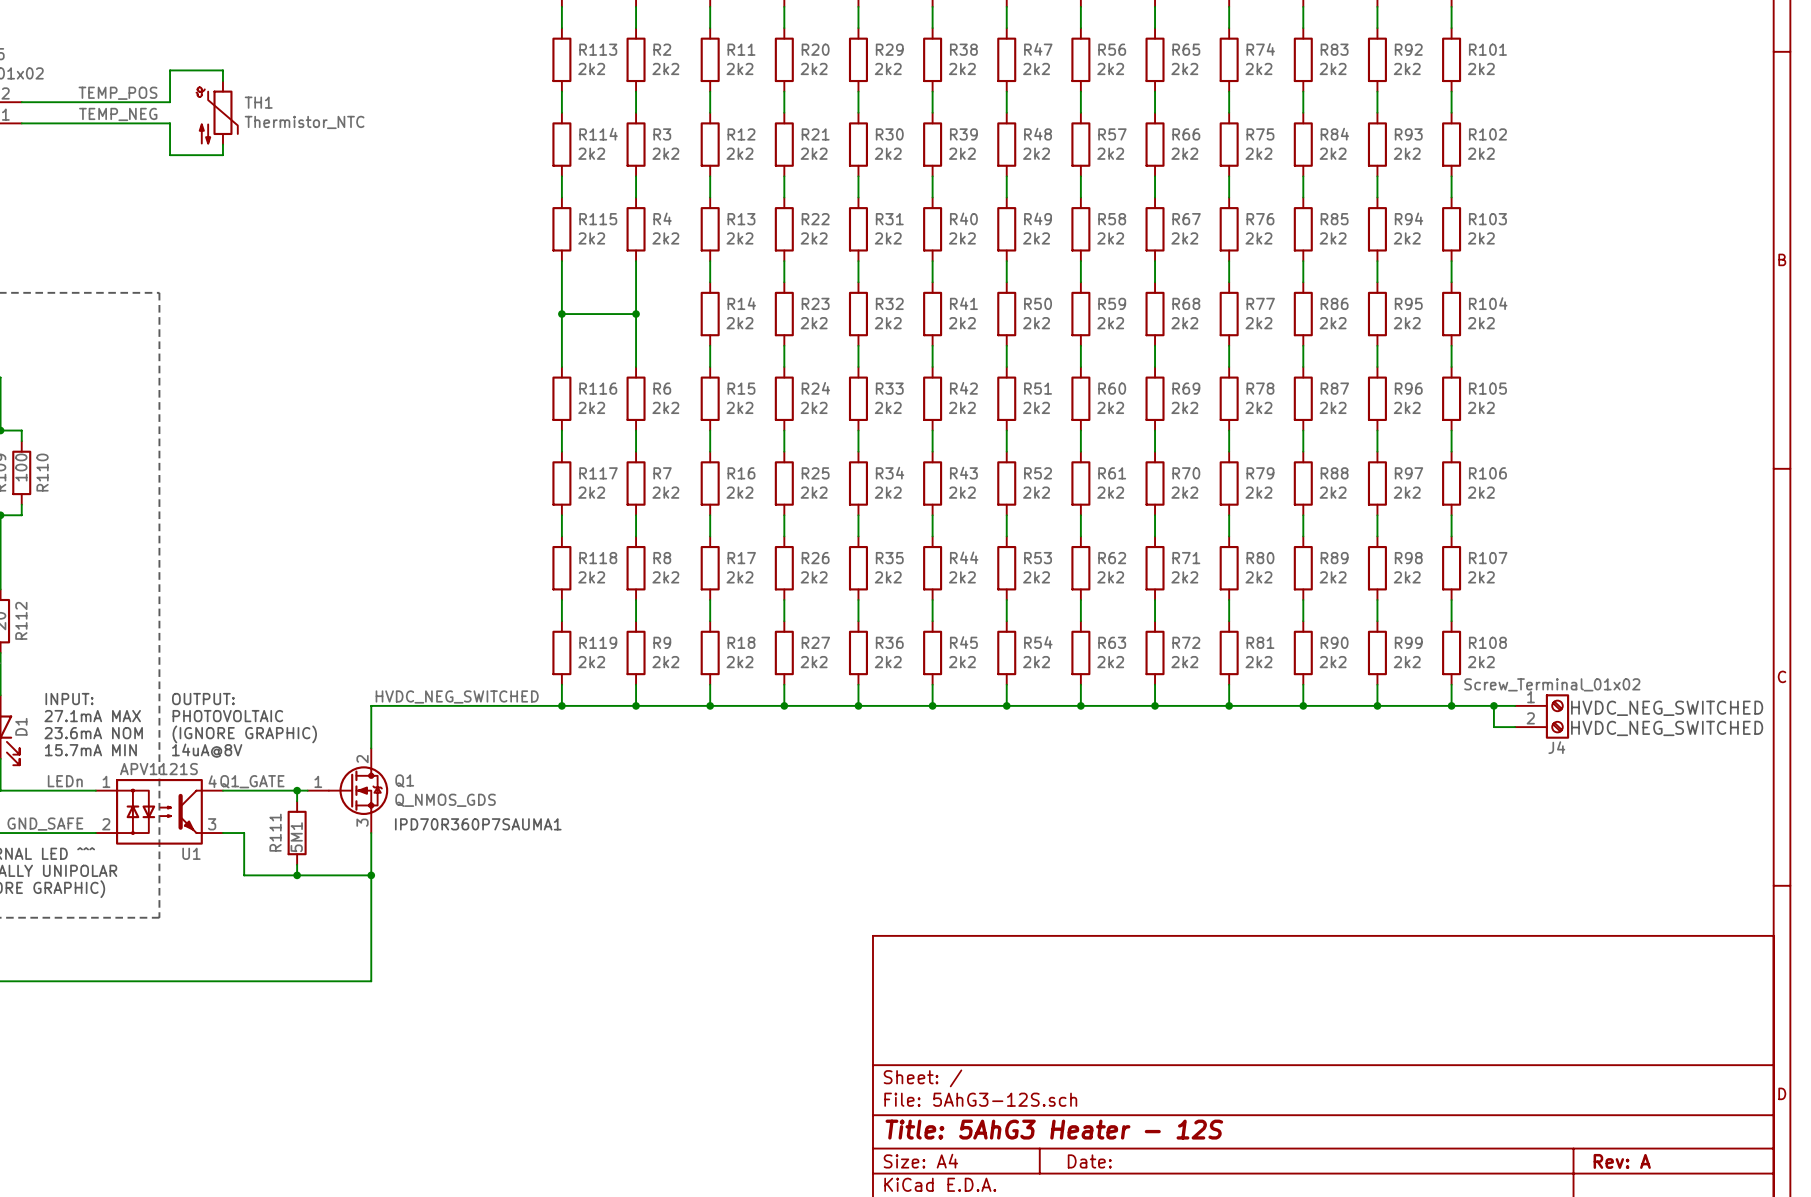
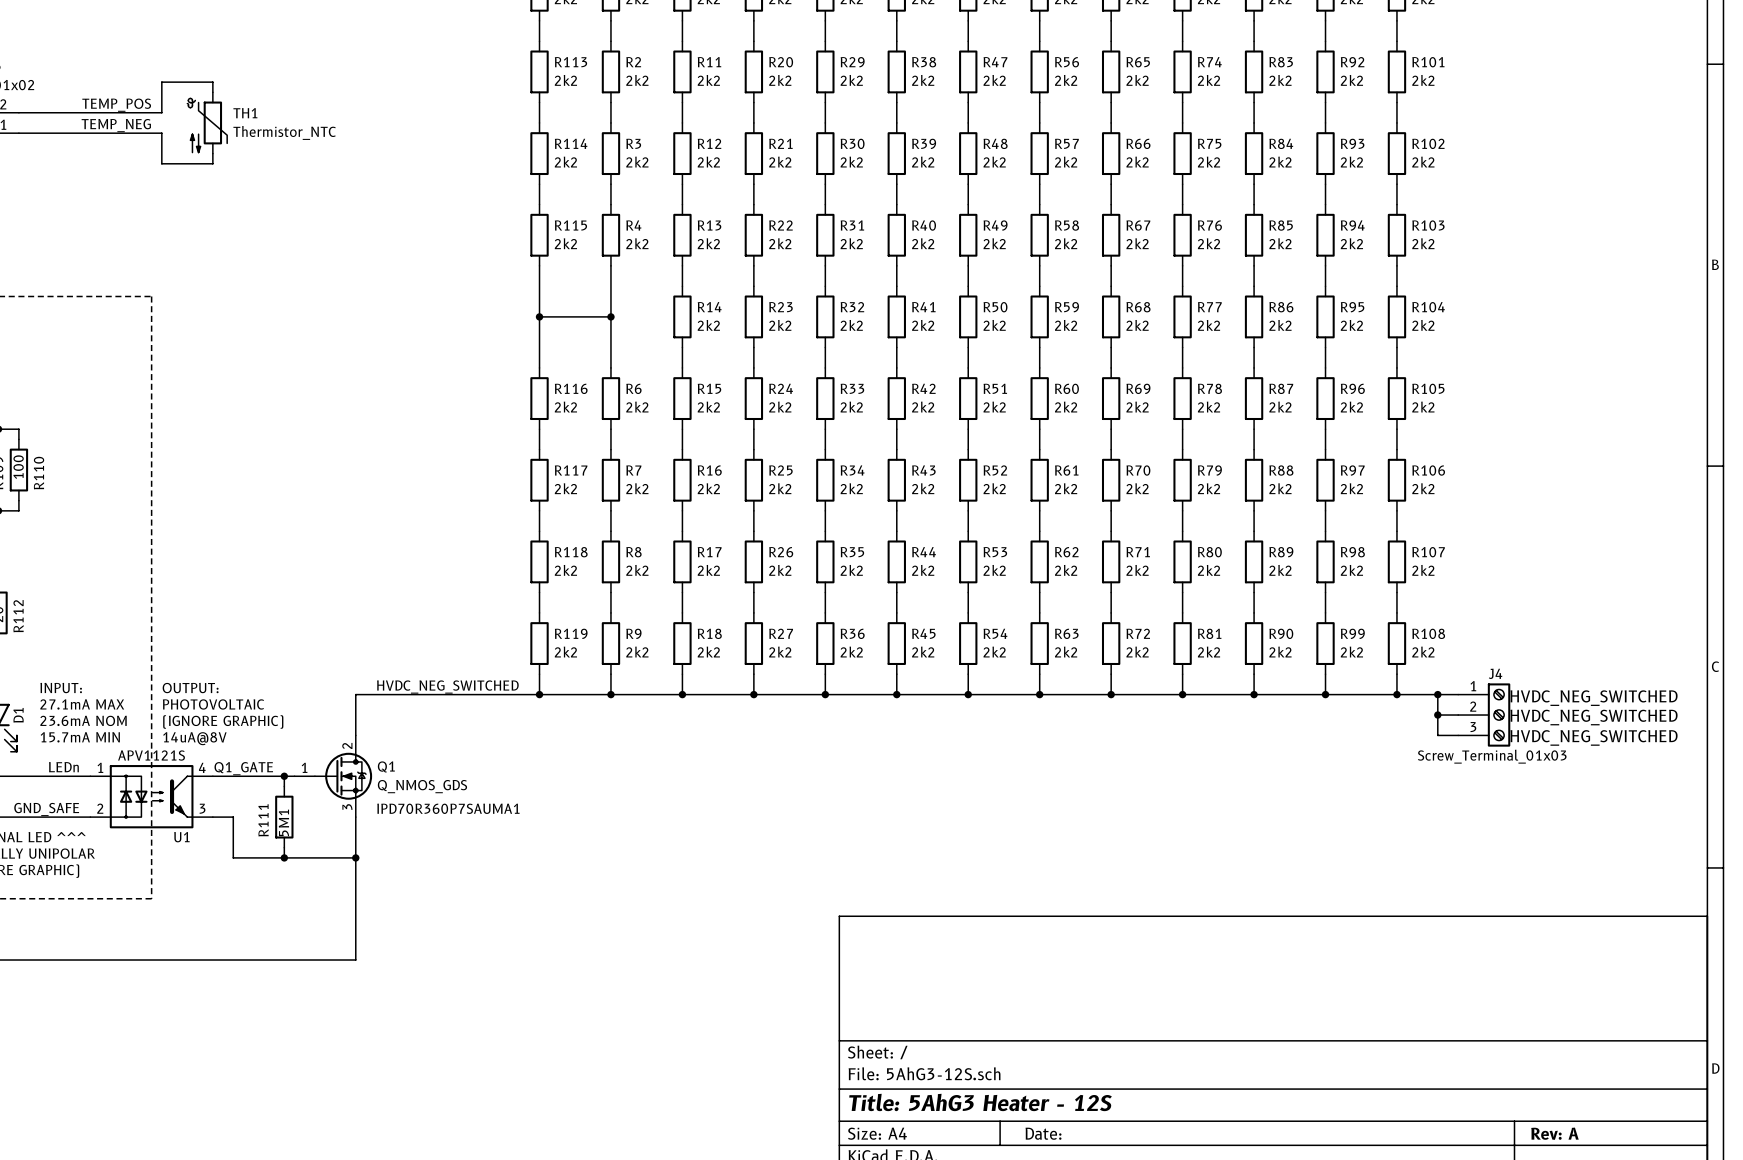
J4 value: Screw_Terminal_01x02 (1552, 684) -> Screw_Terminal_01x03 (1492, 756)
J4 symbol: [1515, 694, 1570, 739] -> [1458, 683, 1511, 747]
wire: none -> (1437, 715) (1437, 735) (1458, 735)
junction: none -> (1437, 715)
J4 name position: J4 (1556, 747) -> J4 (1495, 673)
text: none -> HVDC_NEG_SWITCHED (1594, 737)

